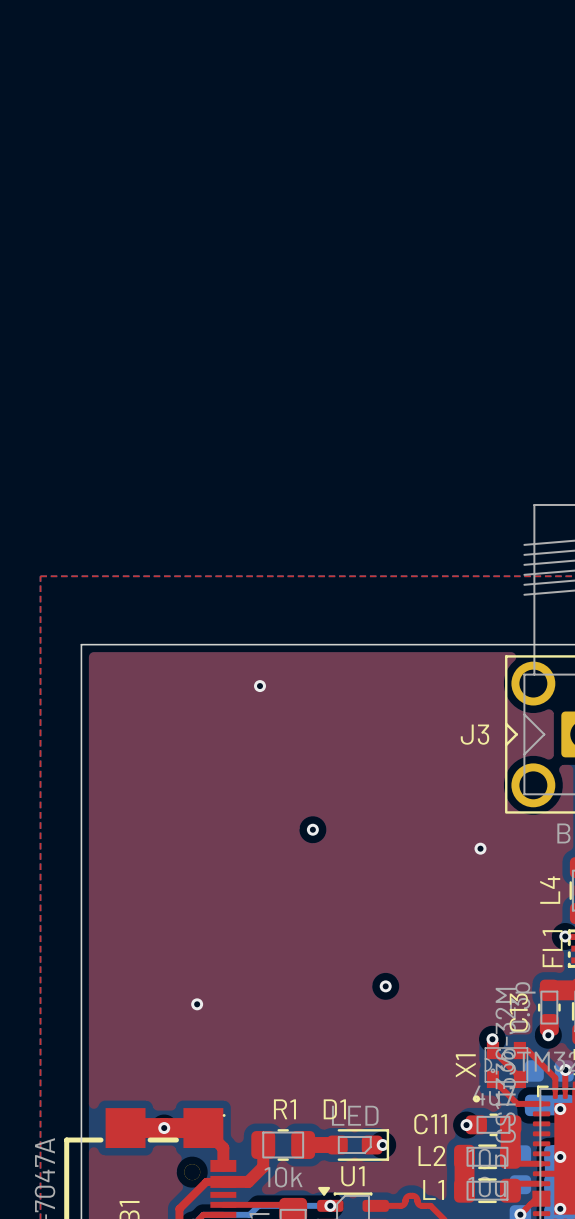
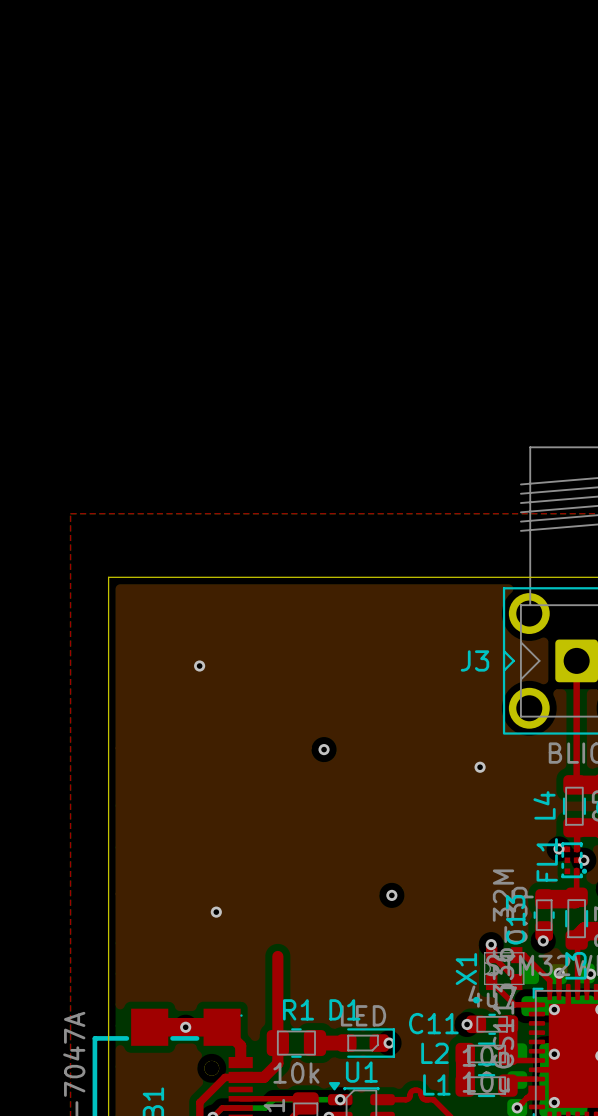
via position: (260, 686) -> (199, 666)
top track: none -> (277, 956) (277, 1043)

